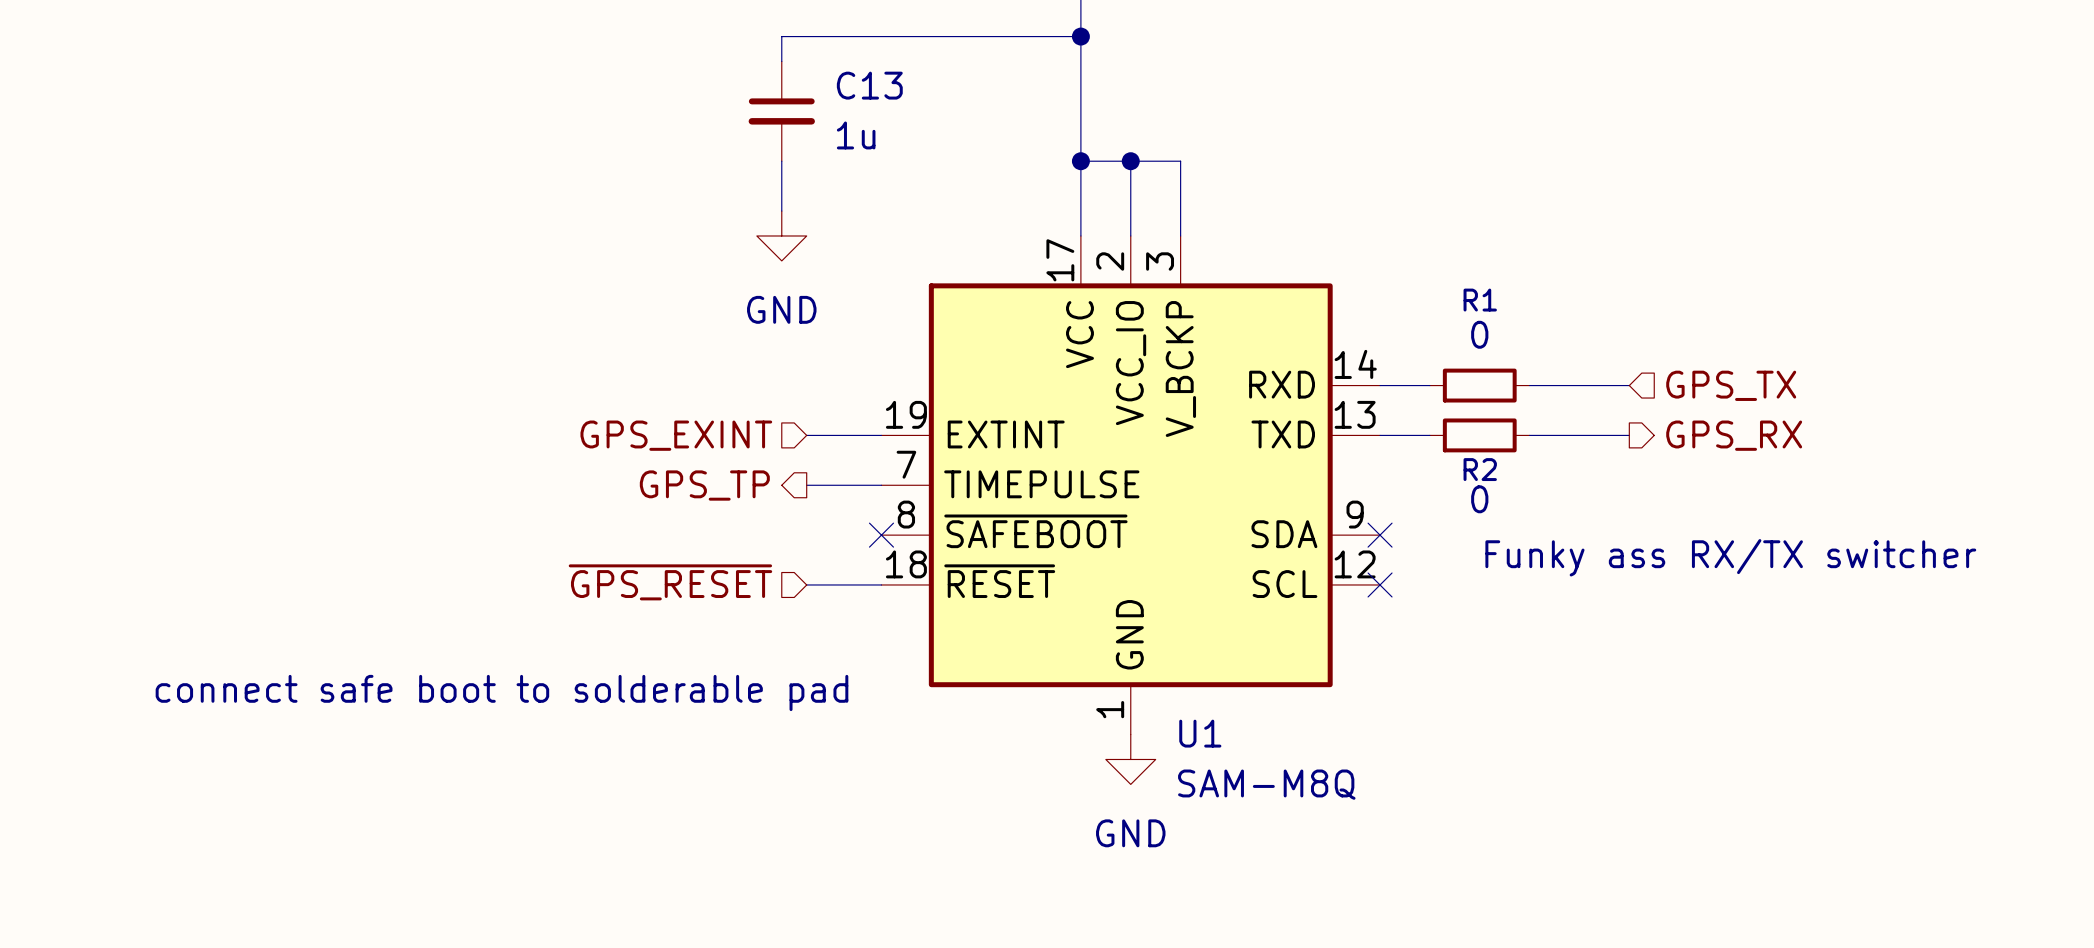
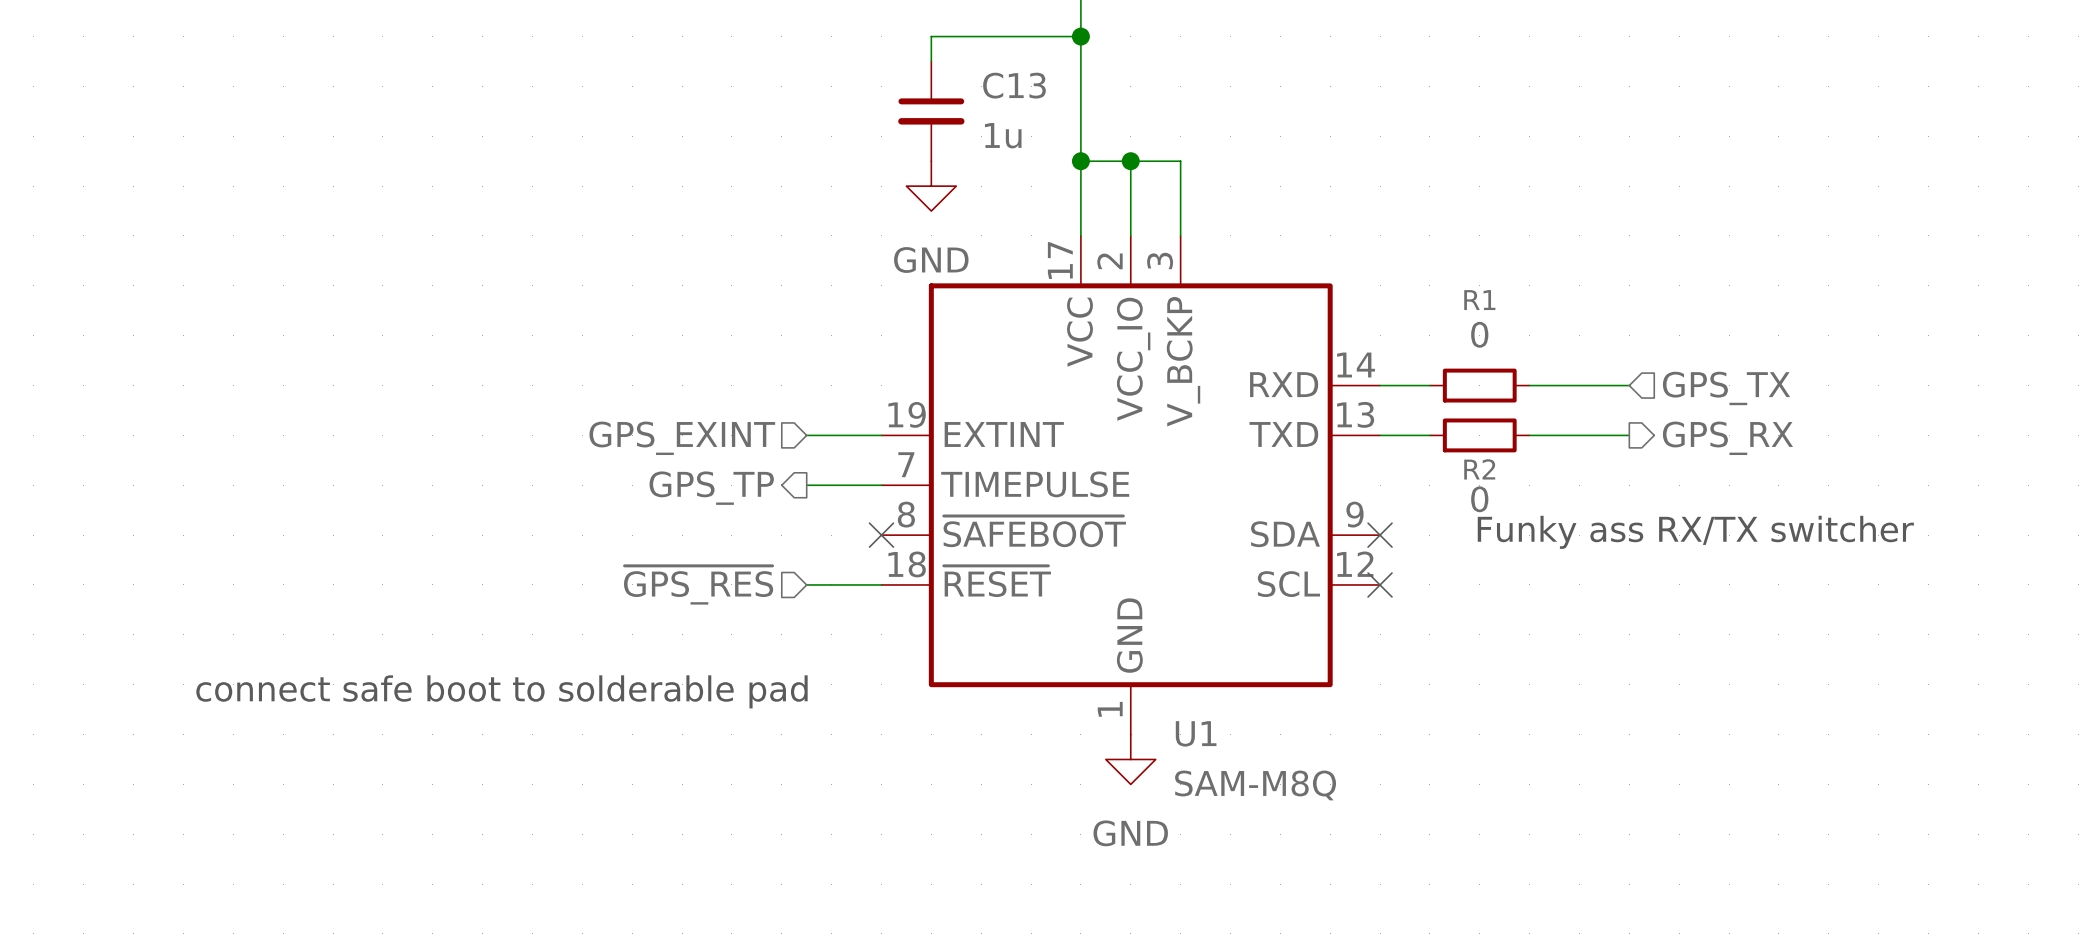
wire: (931, 36) (781, 36) (781, 61) -> (931, 36) (931, 61)
C13 position: (781, 111) -> (931, 111)
wire: (781, 161) (781, 211) -> none
power symbol position: GND (781, 235) -> GND (931, 186)
text position: Funky ass RX/TX switcher (1730, 557) -> Funky ass RX/TX switcher (1695, 532)
hierarchical label: ~{GPS_RESET} (670, 582) -> ~{GPS_RES} (698, 585)

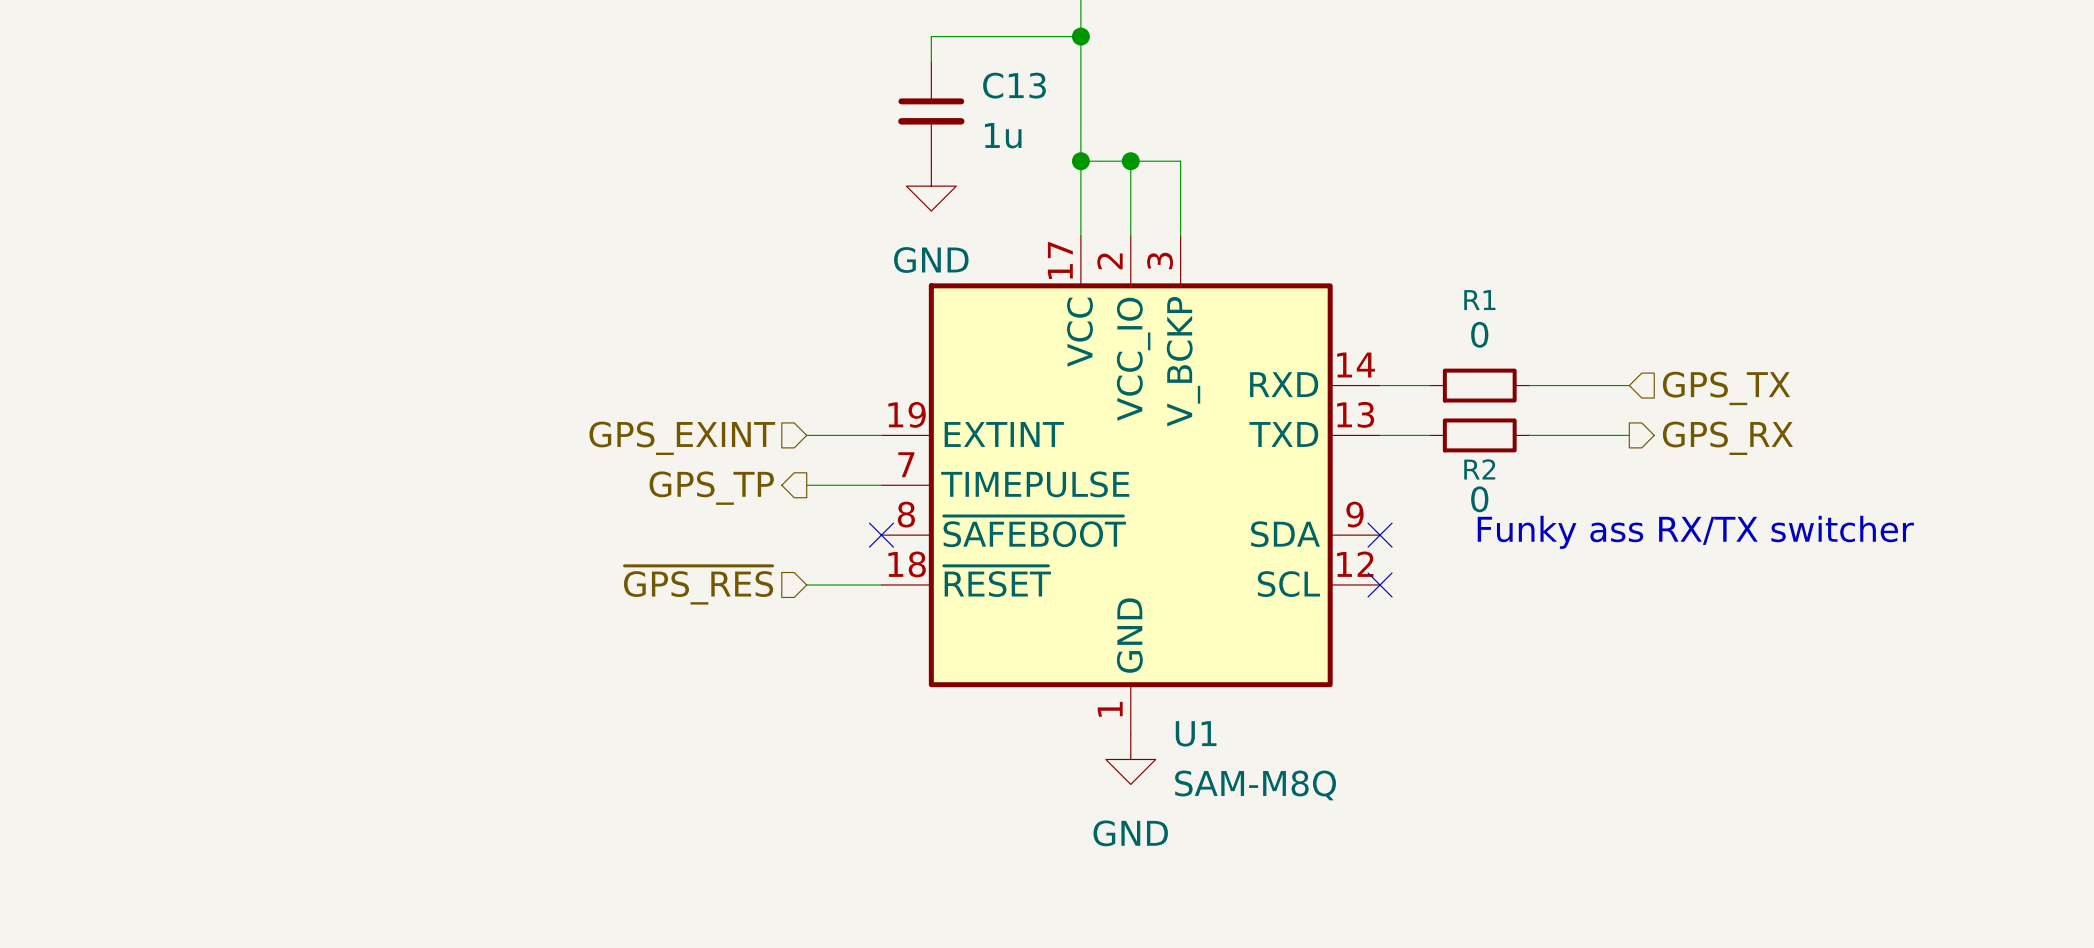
text: connect safe boot to solderable pad (501, 691) -> none

